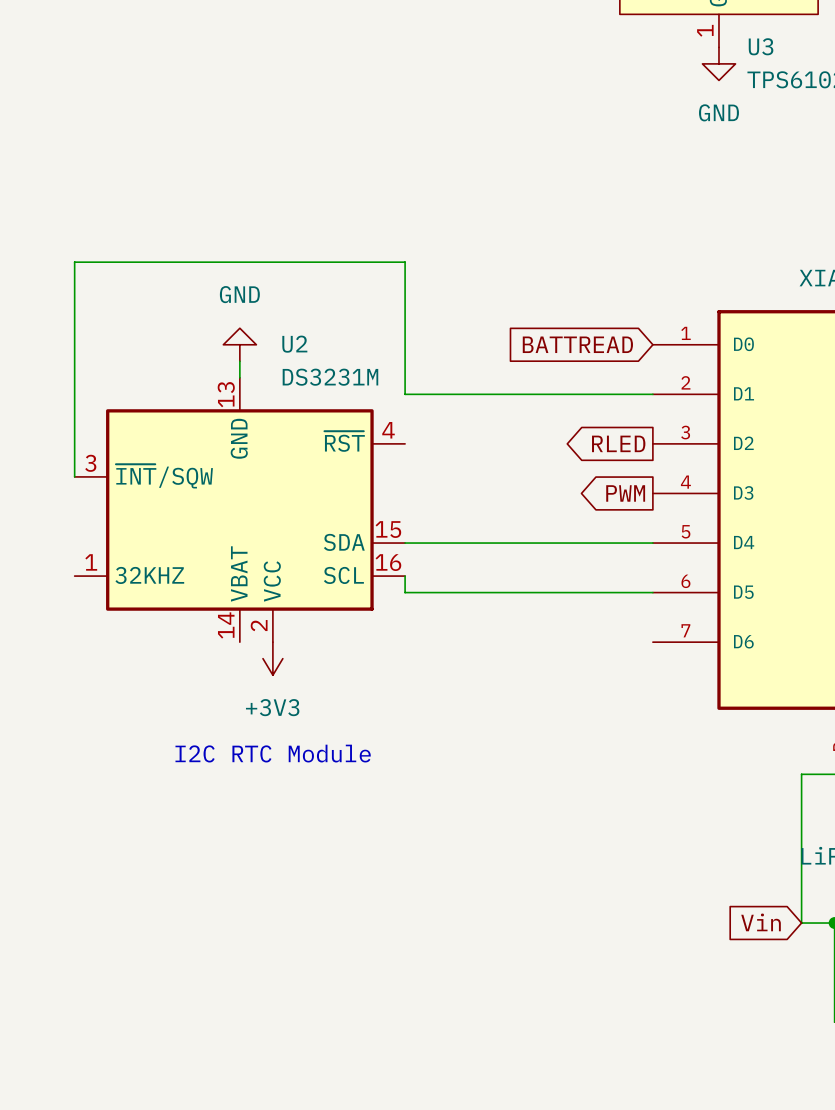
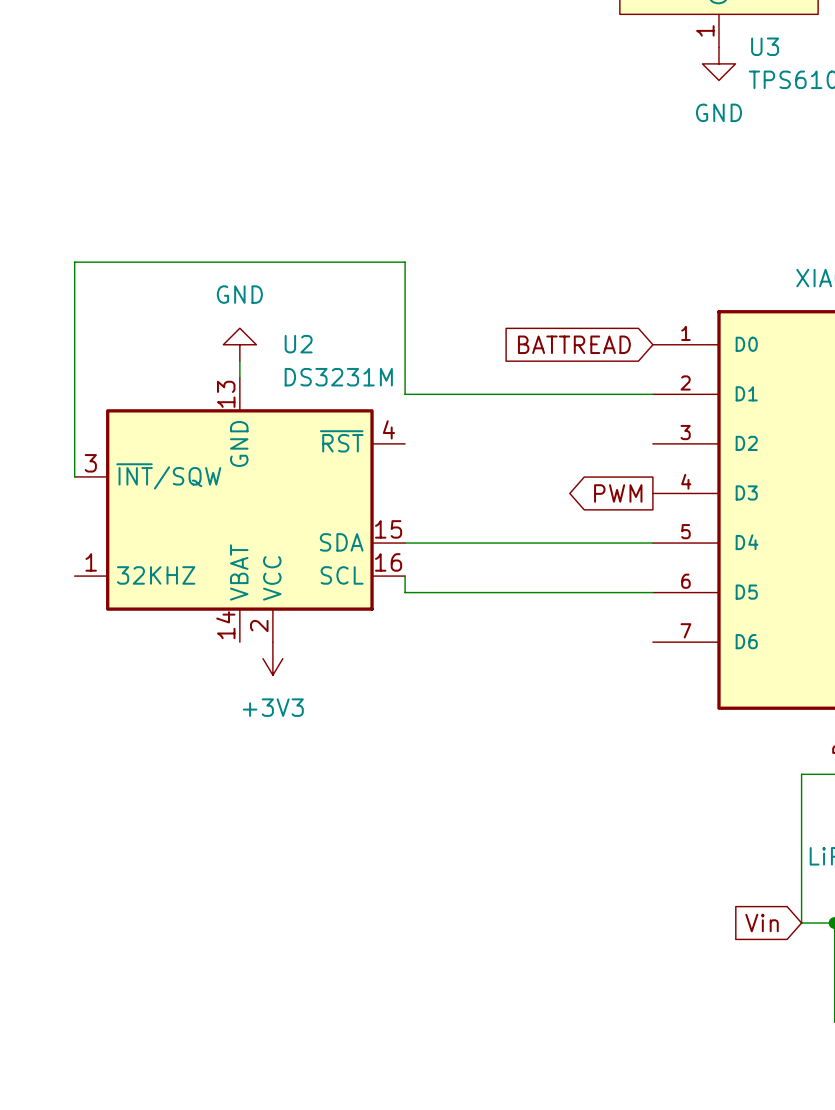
global label: RLED (618, 443) -> none
text: I2C RTC Module (273, 753) -> none

